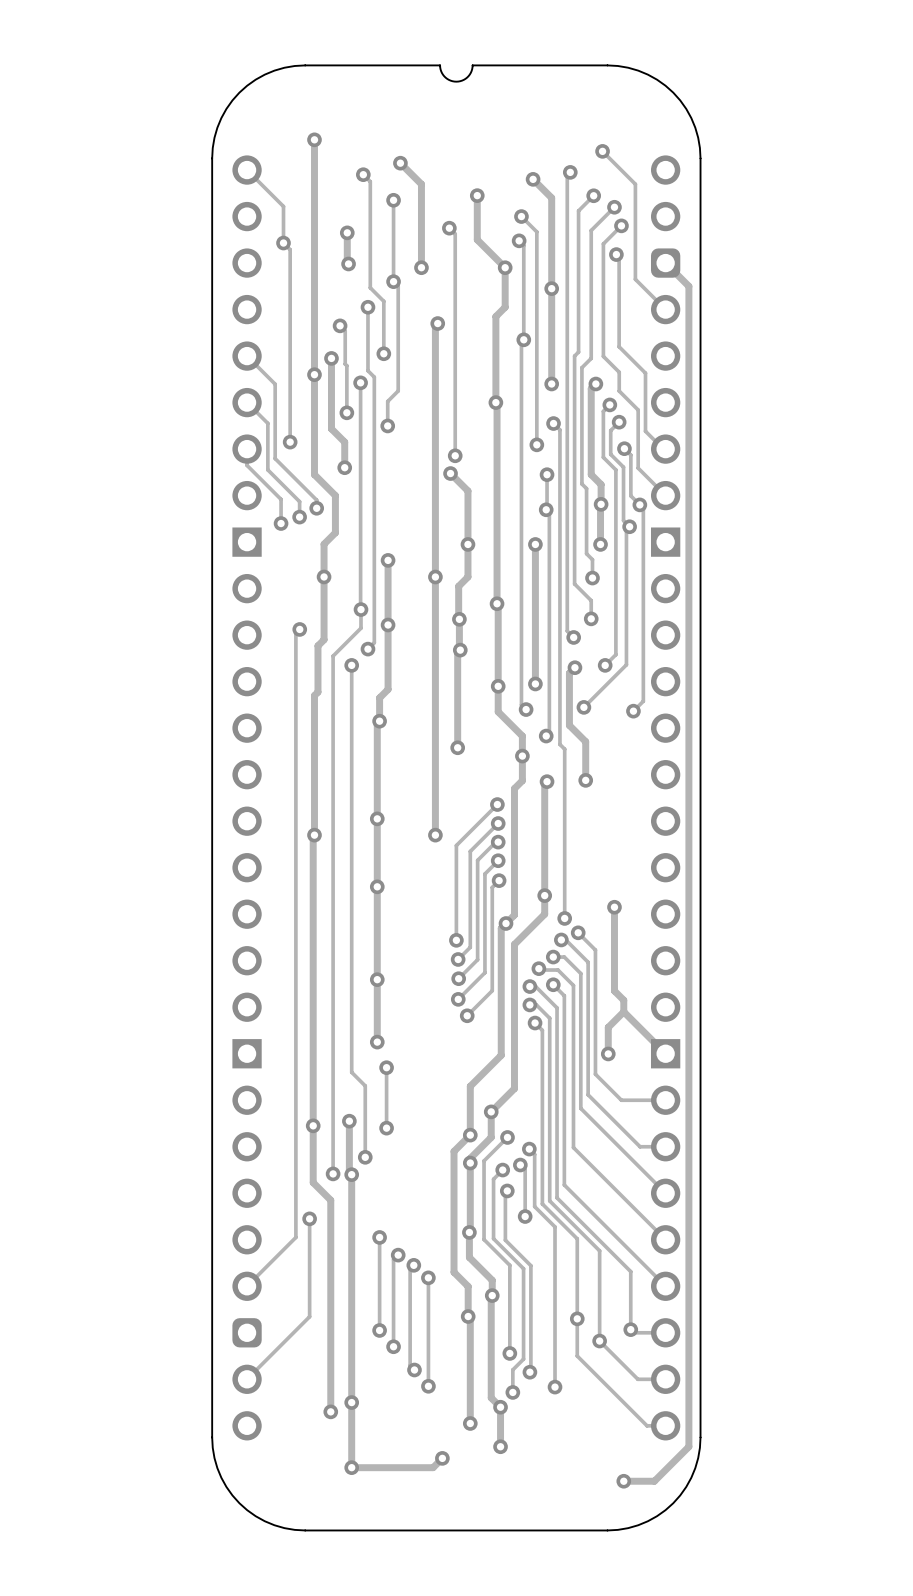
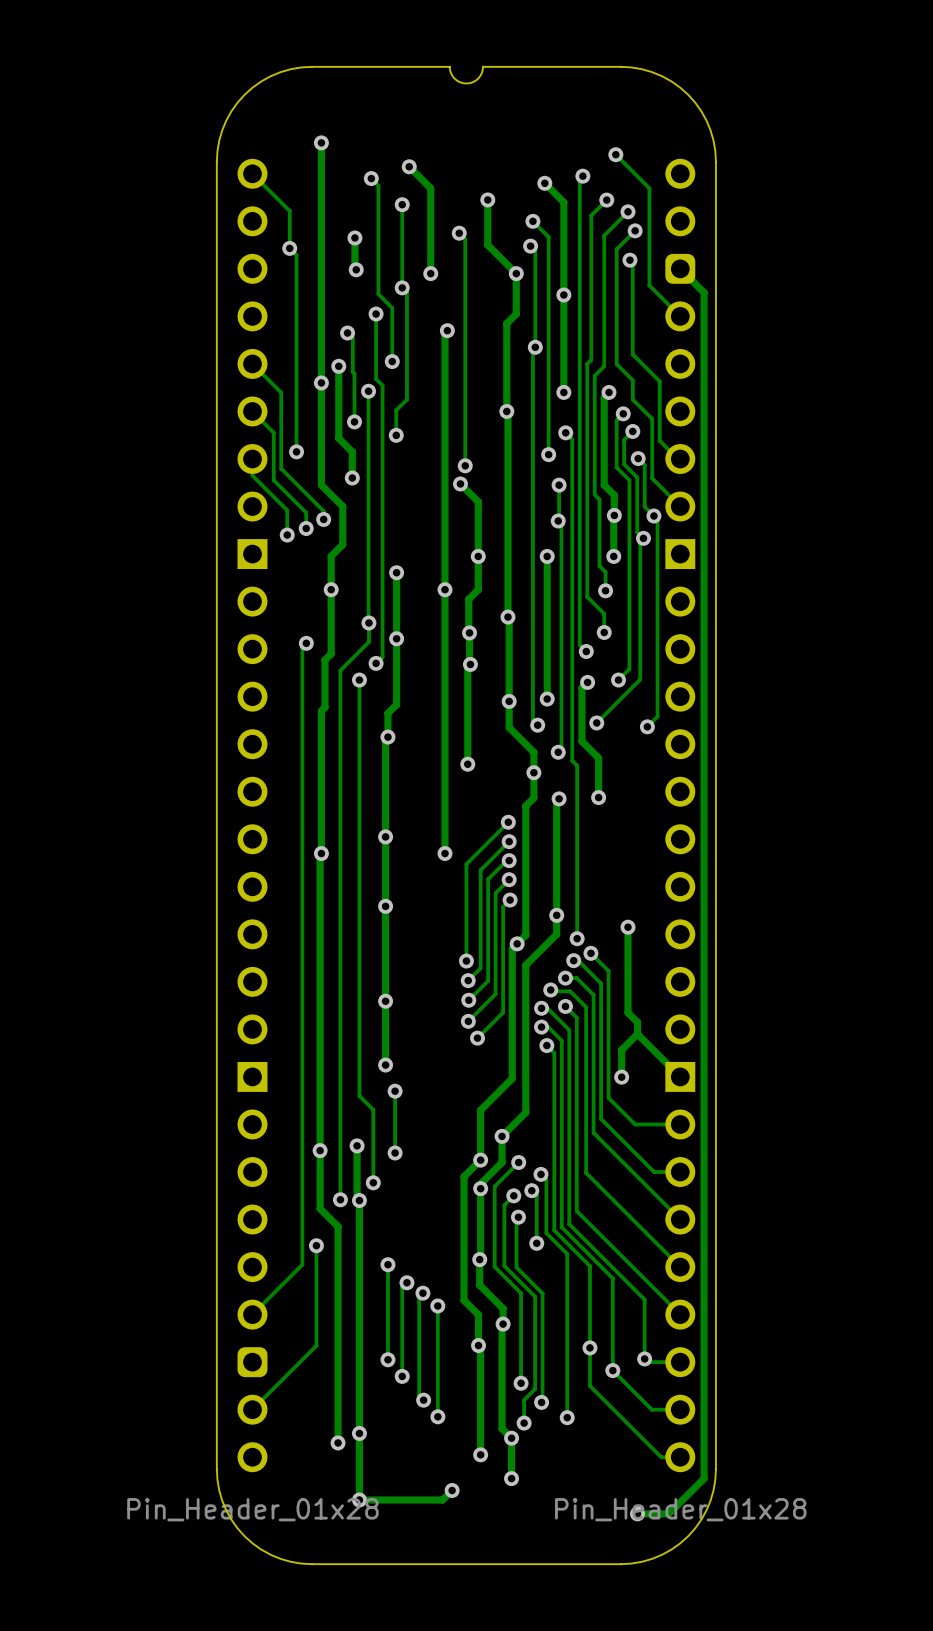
drawing: none -> [127, 1498, 379, 1522]
drawing: none -> [555, 1498, 807, 1522]

